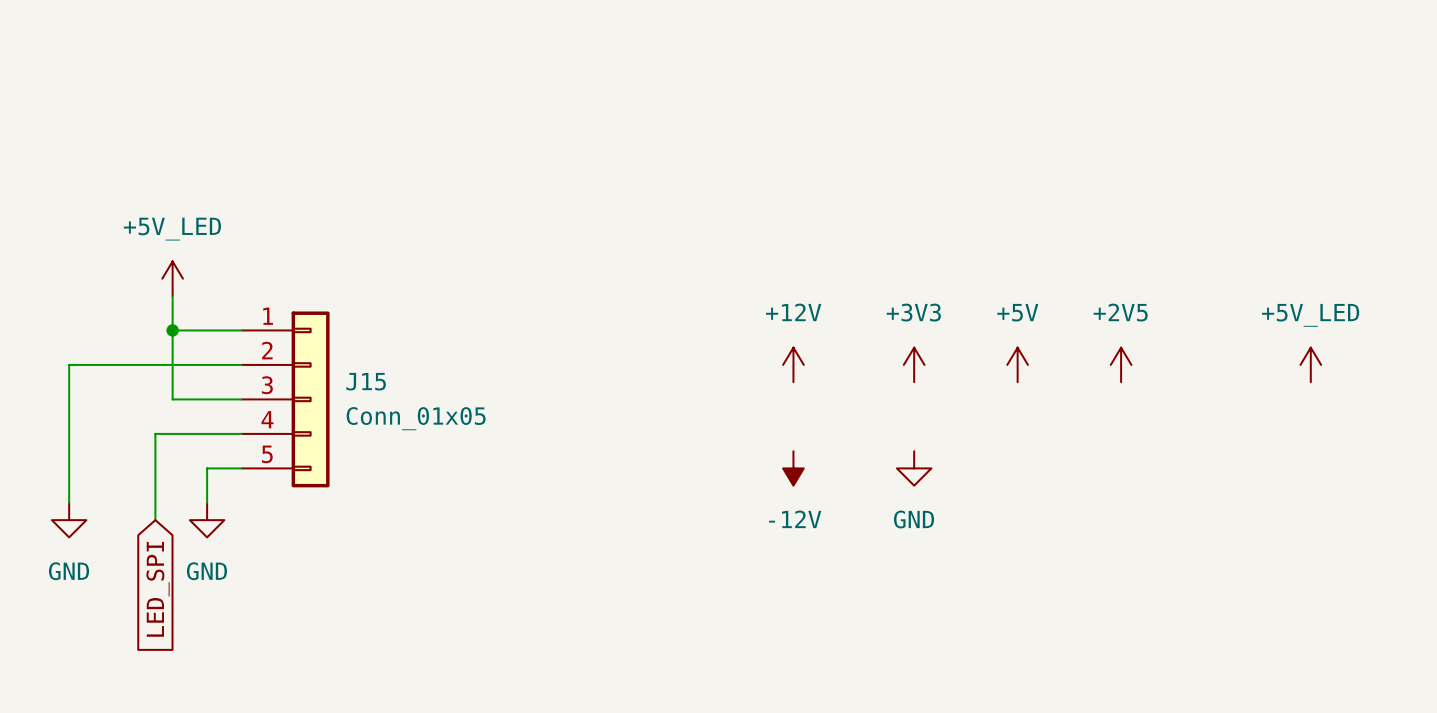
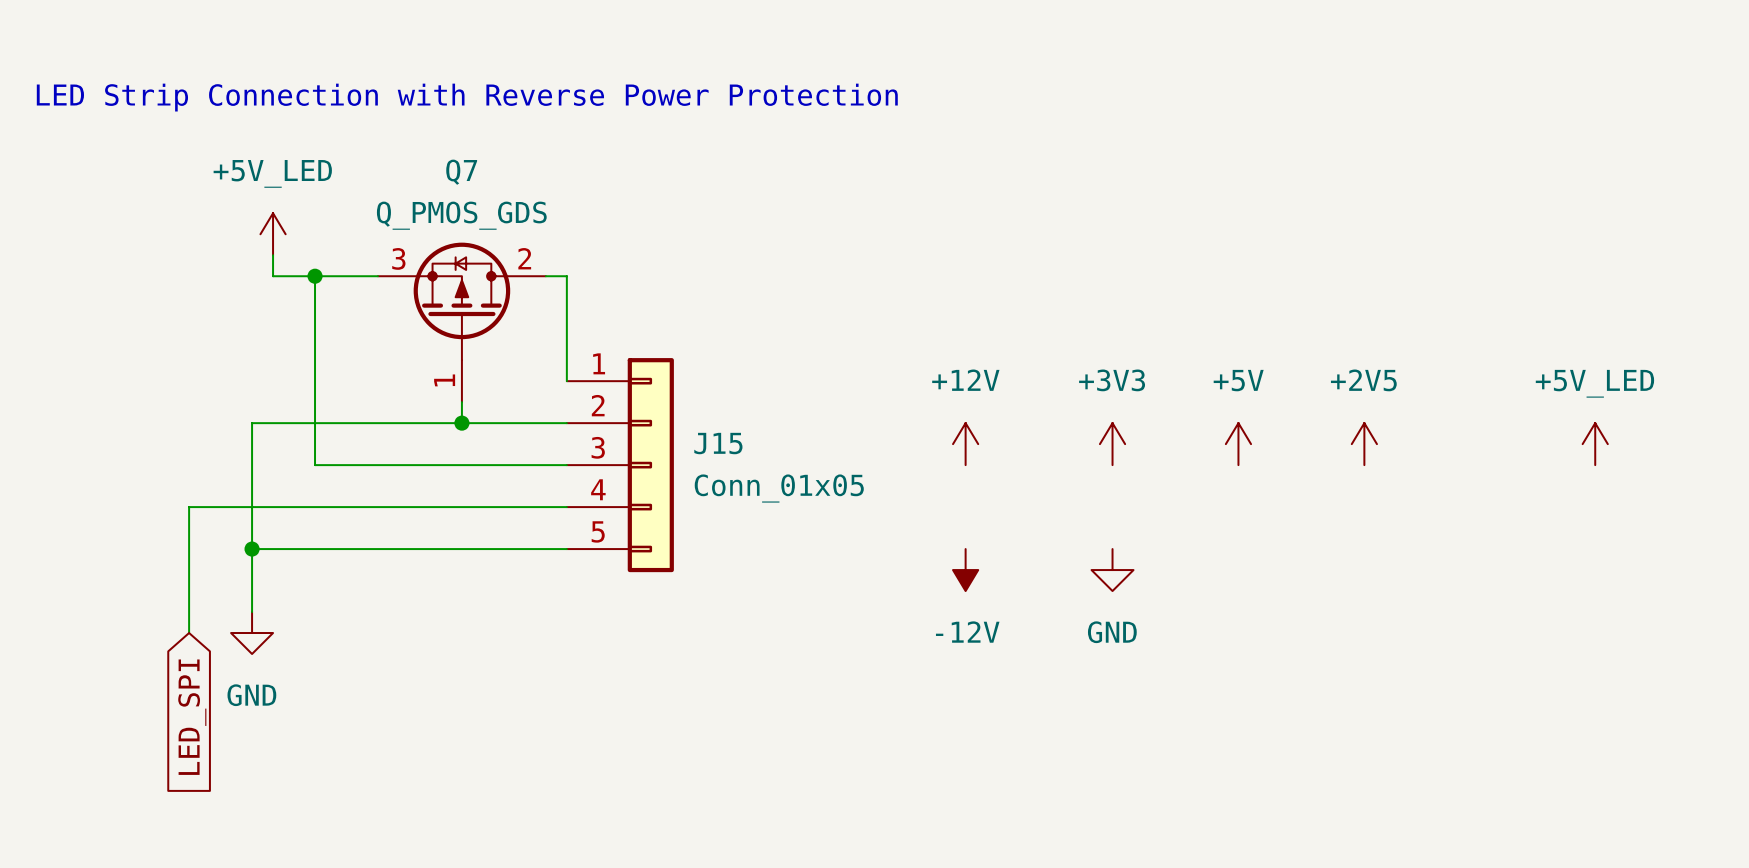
text: none -> LED Strip Connection with Reverse Power Protection (467, 97)
wire: none -> (273, 255) (273, 276) (377, 276)
wire: none -> (315, 276) (315, 465) (566, 465)
junction: none -> (315, 276)
wire: none -> (545, 276) (566, 276) (566, 381)
Q7: none -> Q_PMOS_GDS (461, 322)
power symbol position: +5V_LED (172, 278) -> +5V_LED (273, 234)
wire: (172, 295) (172, 399) (241, 399) -> none
wire: (172, 330) (241, 330) -> none
junction: (172, 330) -> none
wire: none -> (461, 402) (461, 423)
junction: none -> (461, 423)
wire: (241, 364) (69, 364) (69, 502) -> none
J15 position: (285, 399) -> (620, 465)
wire: (155, 433) (241, 433) -> (189, 528) (189, 507) (566, 507)
wire: none -> (252, 549) (566, 549)
junction: none -> (252, 549)
wire: (207, 468) (241, 468) -> (252, 570) (252, 423) (566, 423)
power symbol: GND (69, 520) -> none

